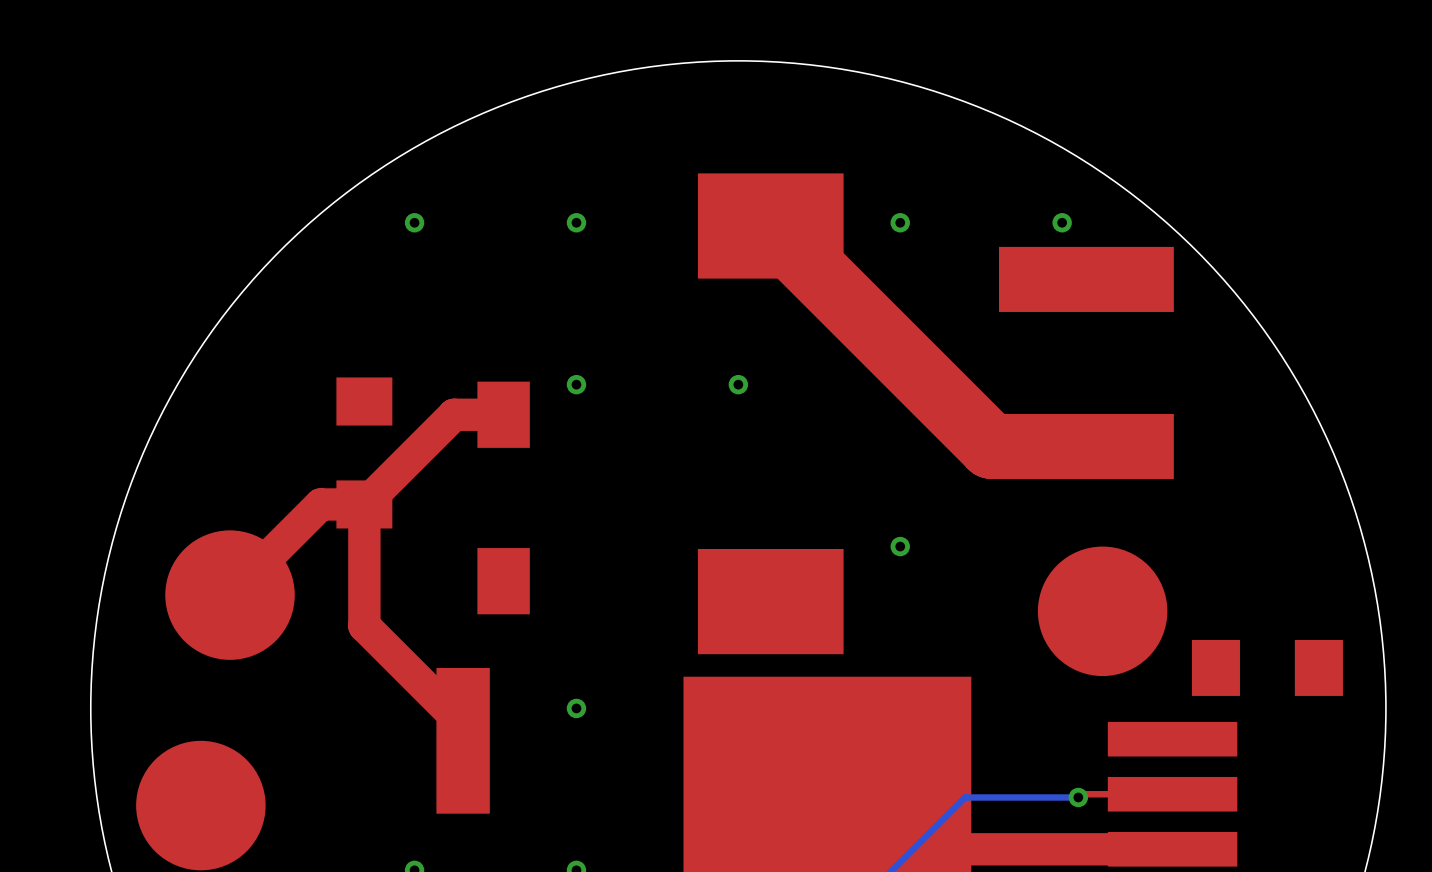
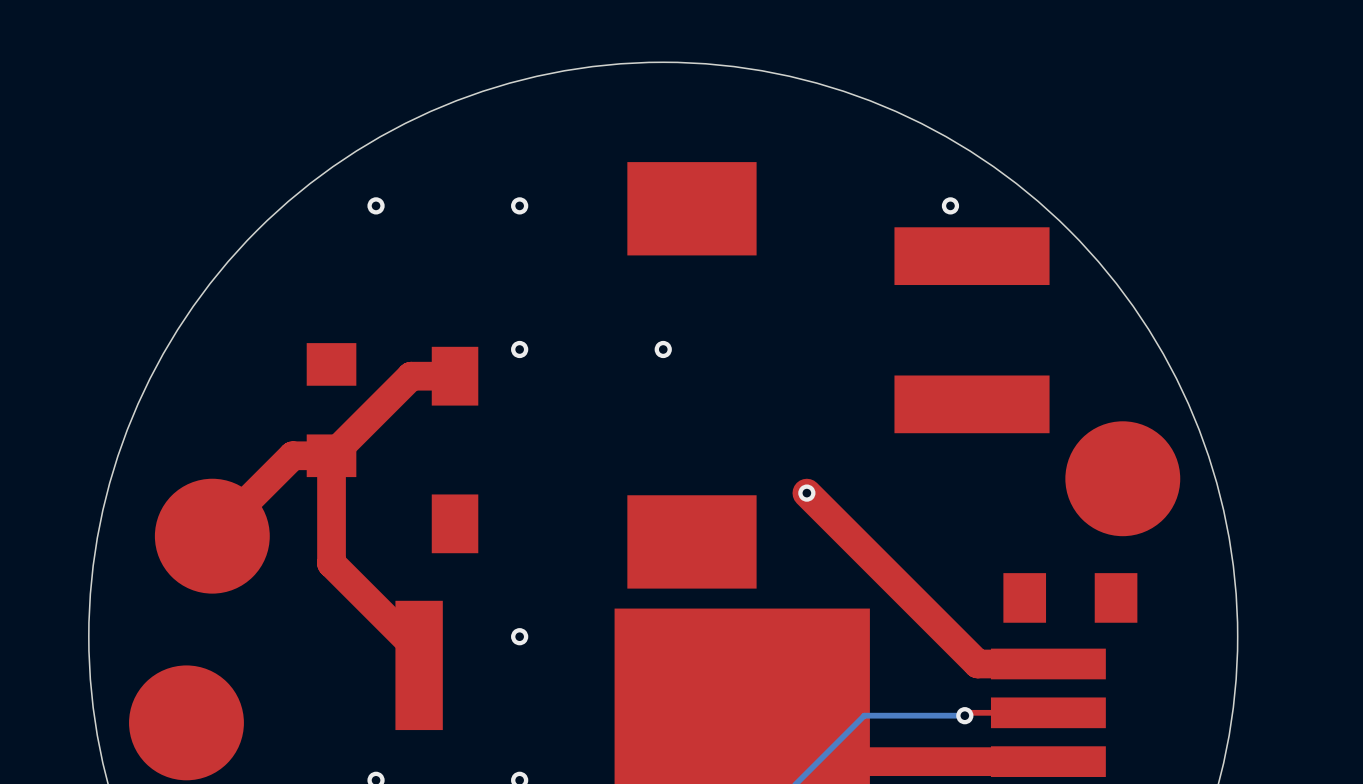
via: (900, 222) -> none
top track: (770, 226) (991, 446) (1086, 446) -> none
top track: none -> (806, 493) (977, 663) (1048, 663)
part position: (1102, 611) -> (1122, 478)
part position: (1267, 667) -> (1070, 597)

